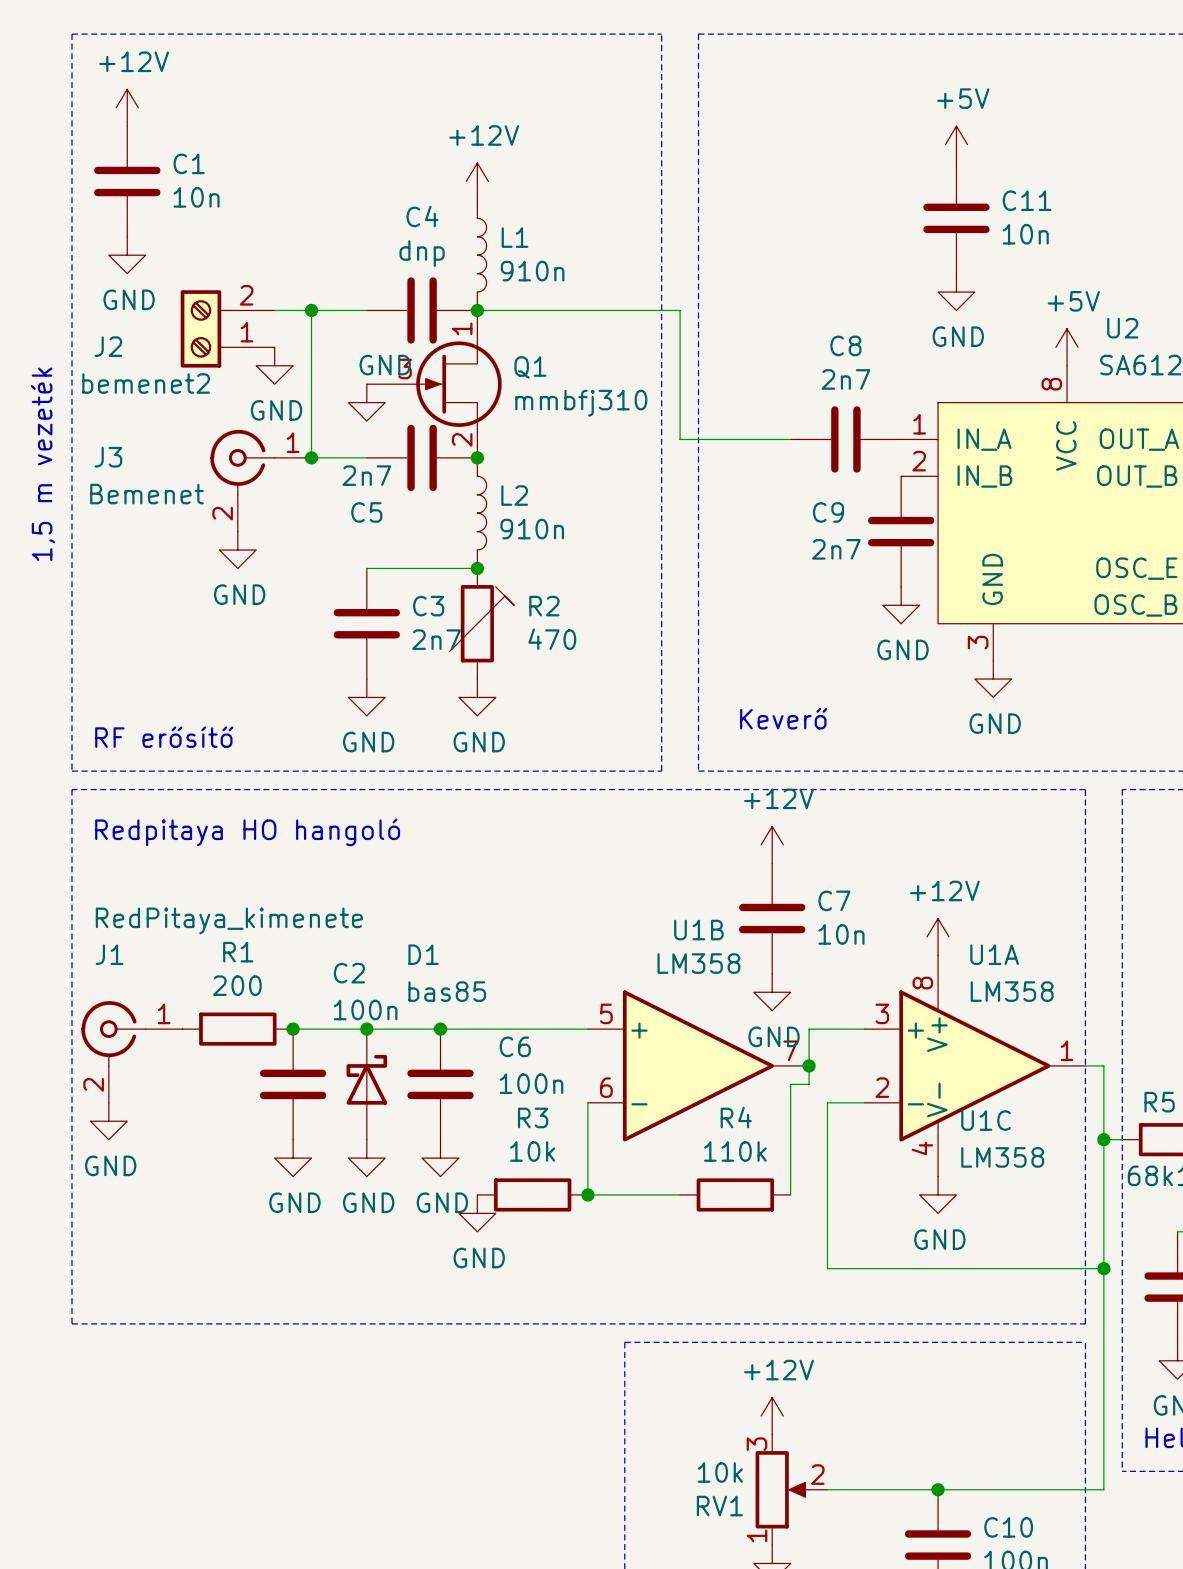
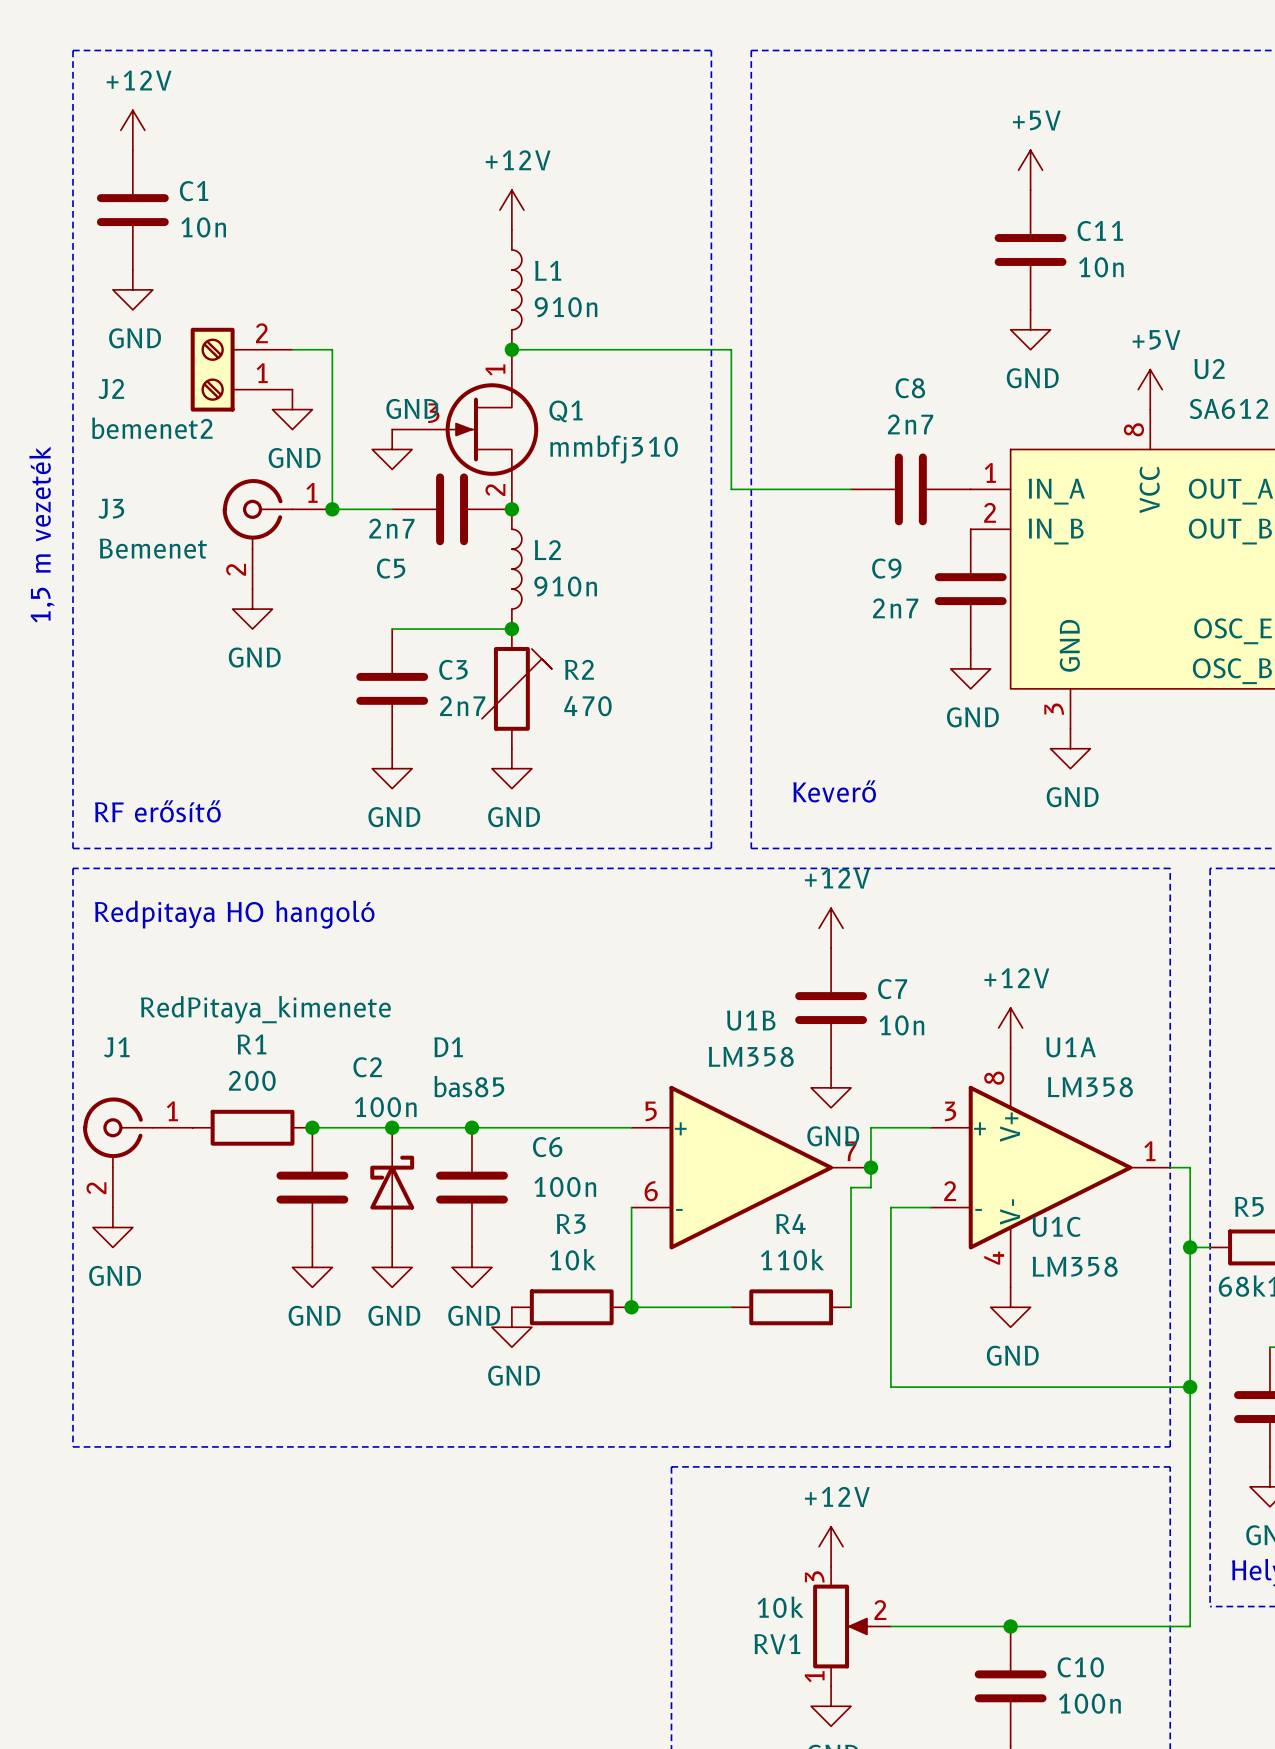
wire: (311, 310) (366, 310) -> none
junction: (311, 310) -> none
C4: dnp (422, 310) -> none

